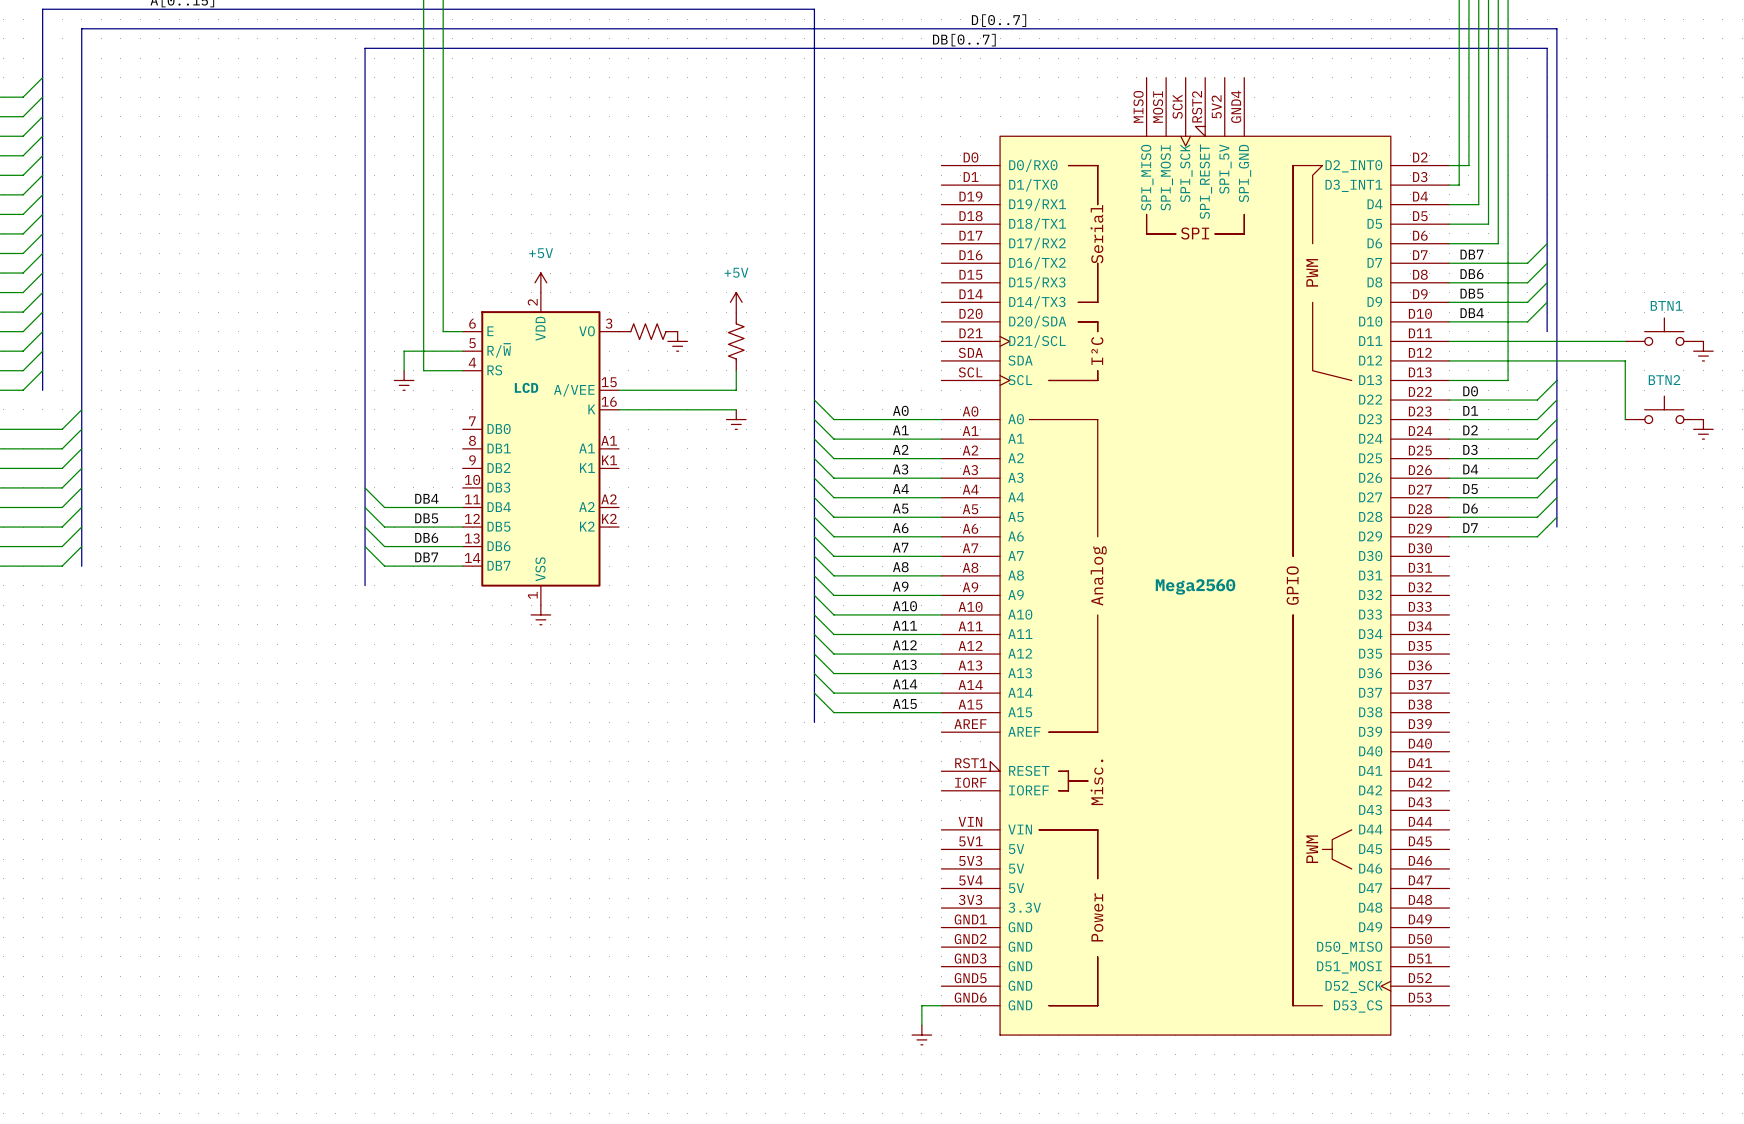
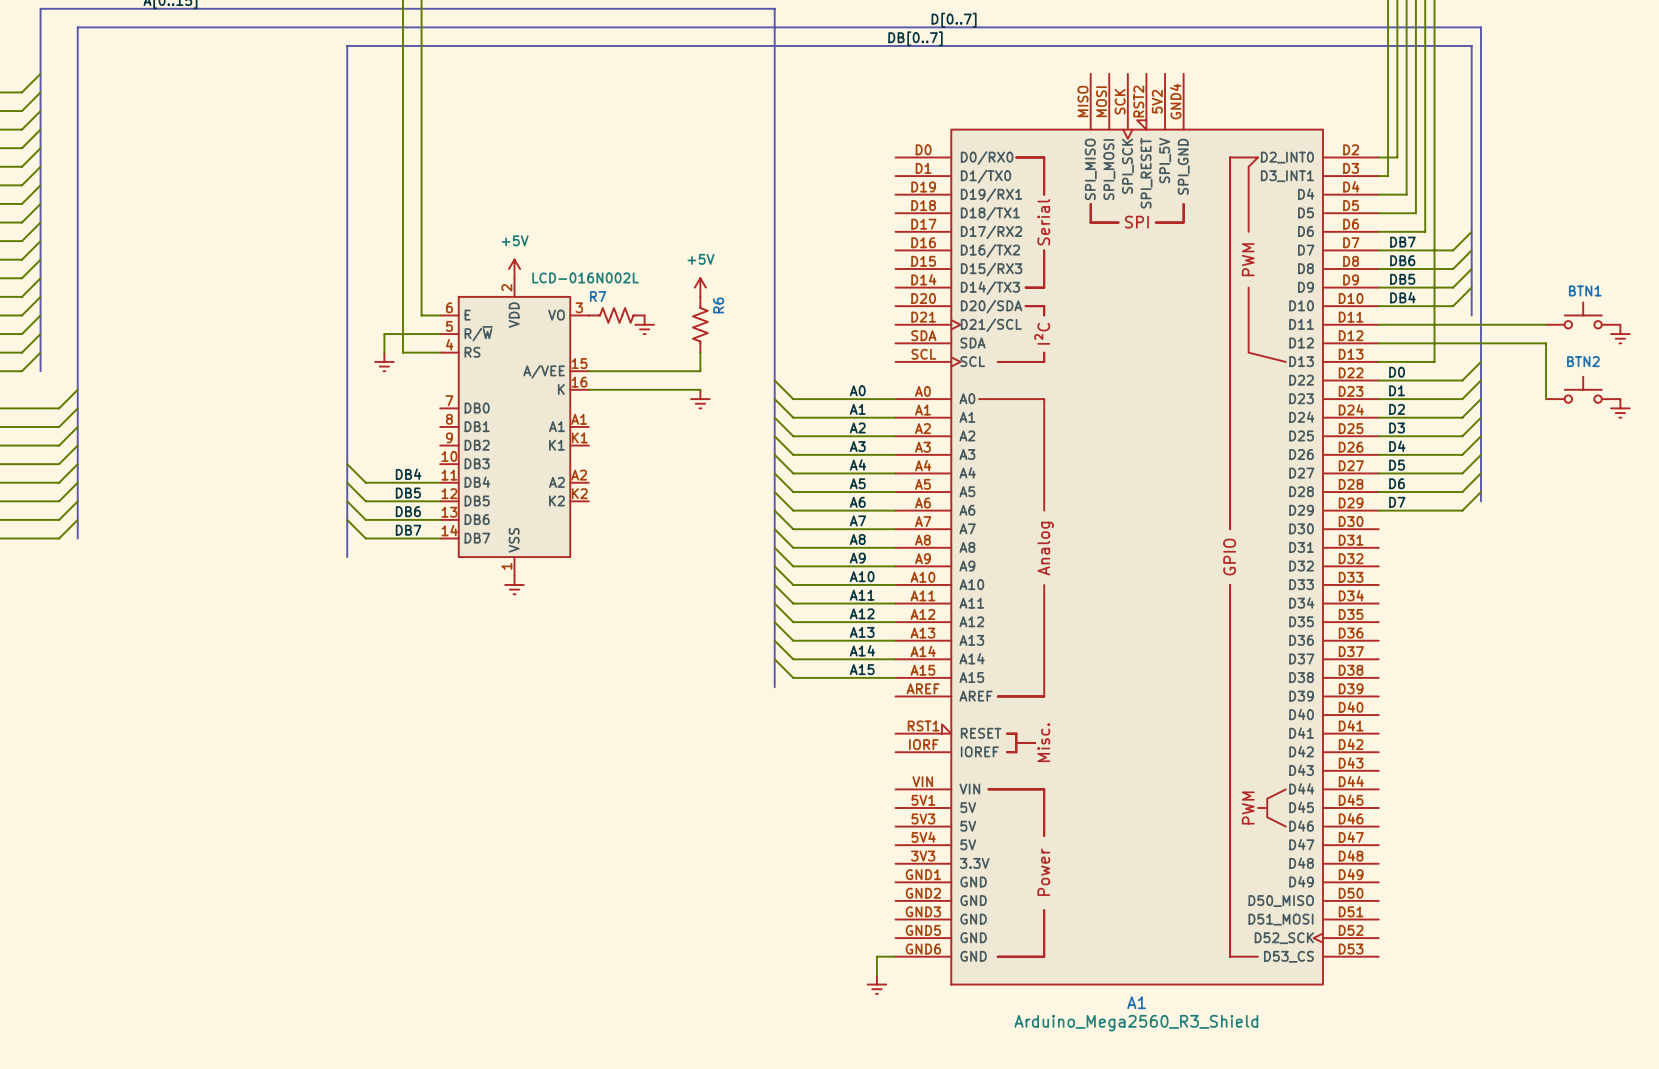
R7 name: none -> R7 (598, 296)
R6 name: none -> R6 (718, 305)
part value: LCD (526, 387) -> LCD-016N002L (585, 277)
A1 value: Mega2560 (1195, 586) -> Arduino_Mega2560_R3_Shield (1136, 1023)
A1 name: none -> A1 (1136, 1002)

